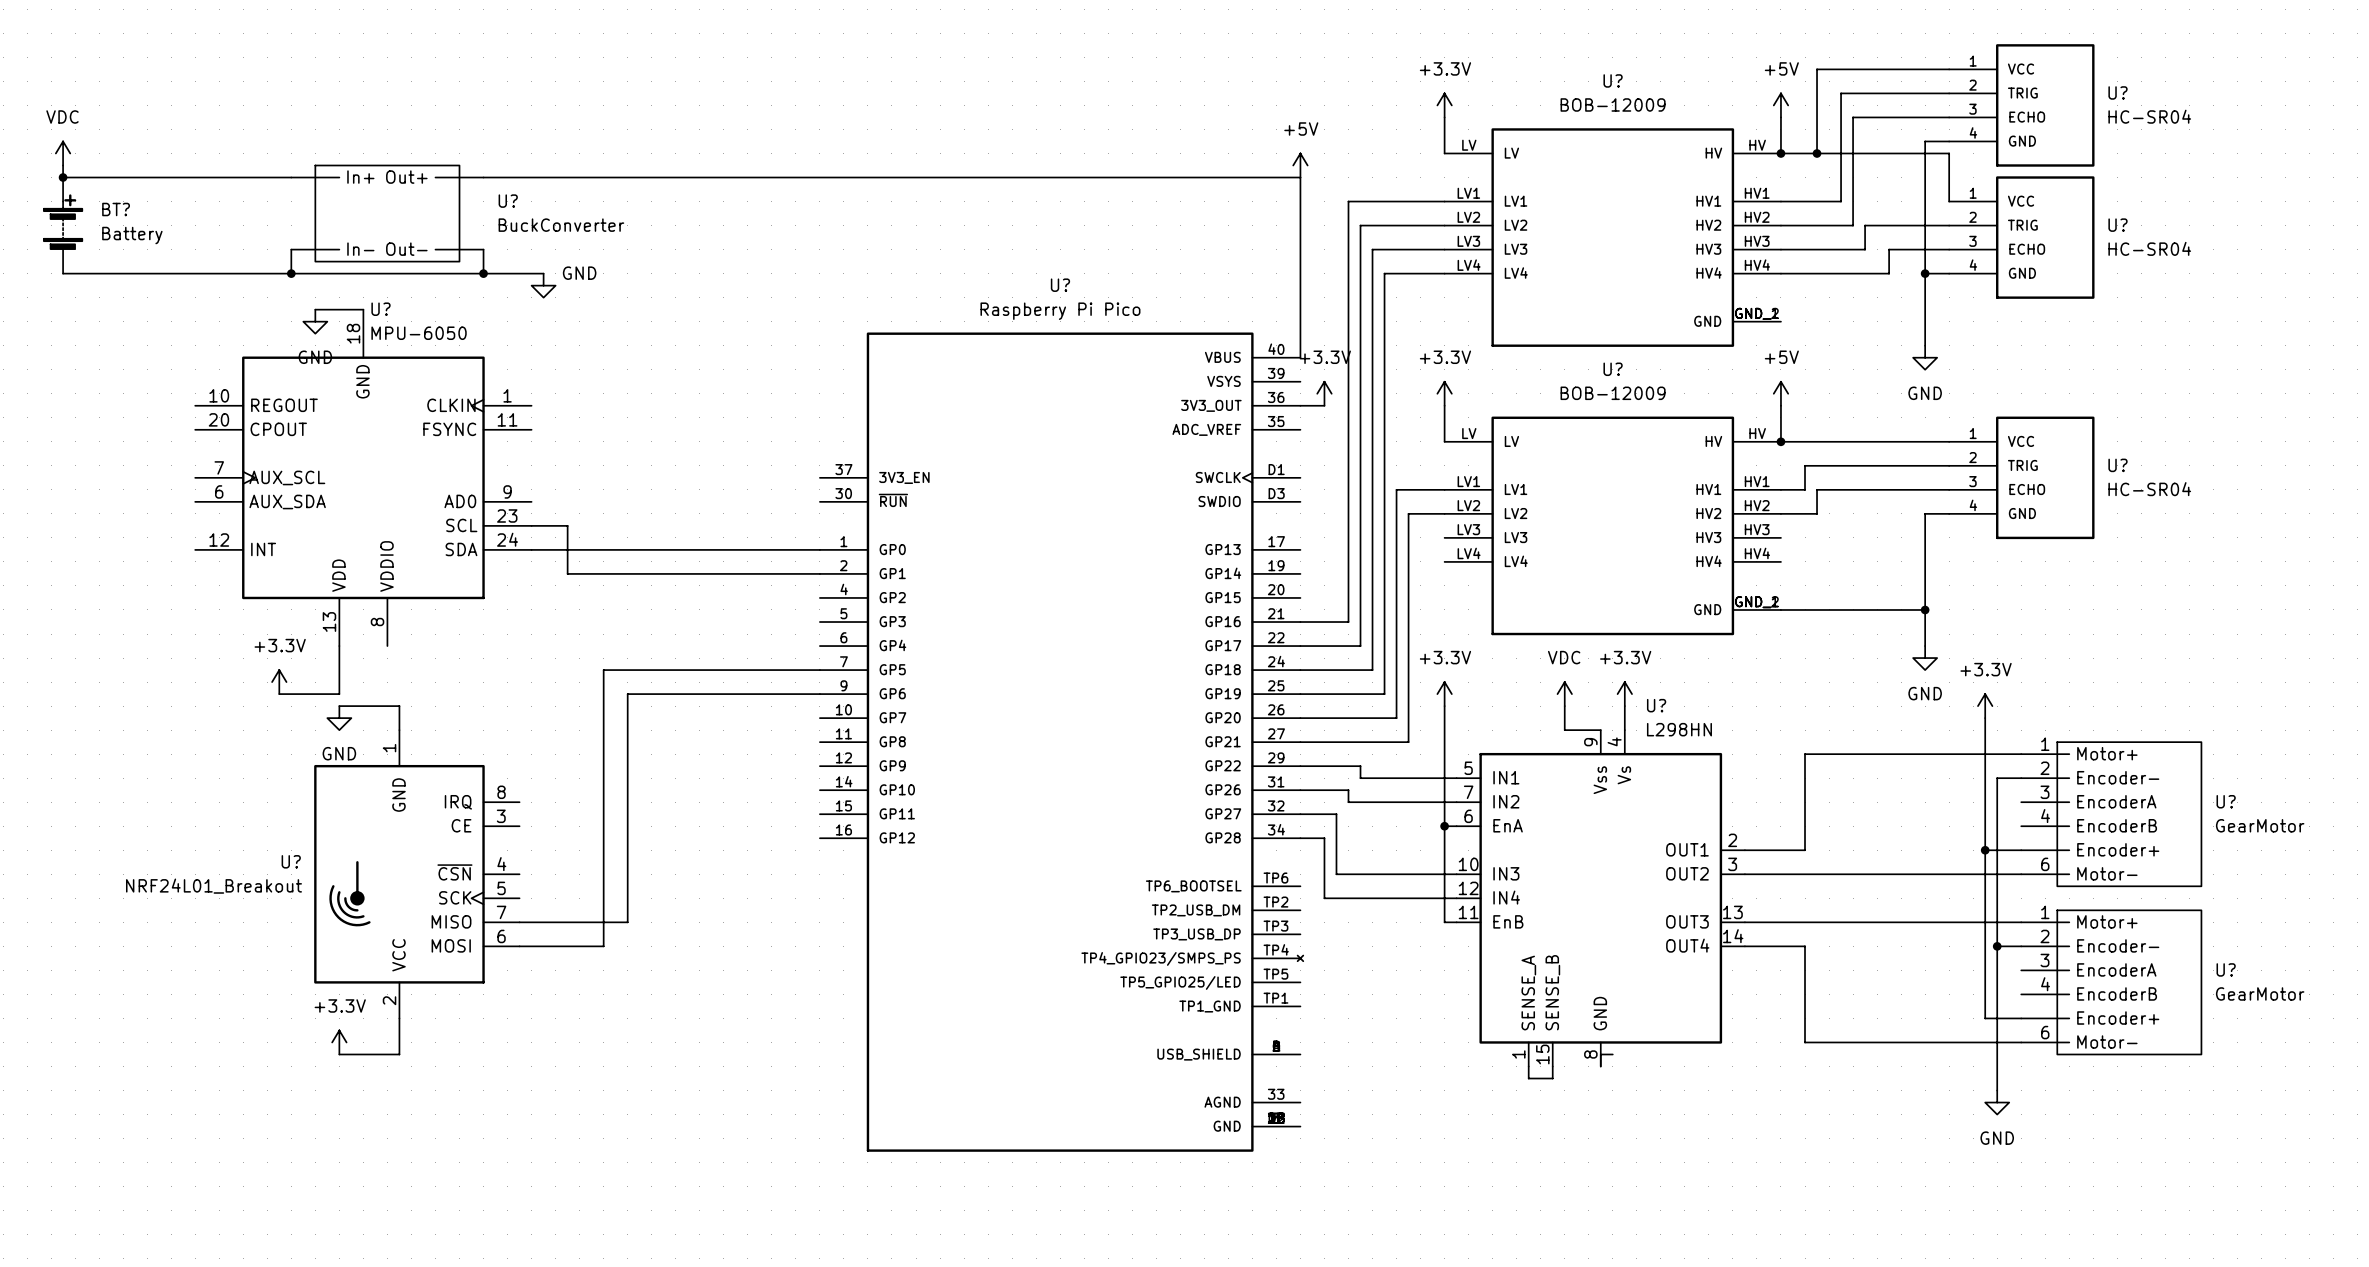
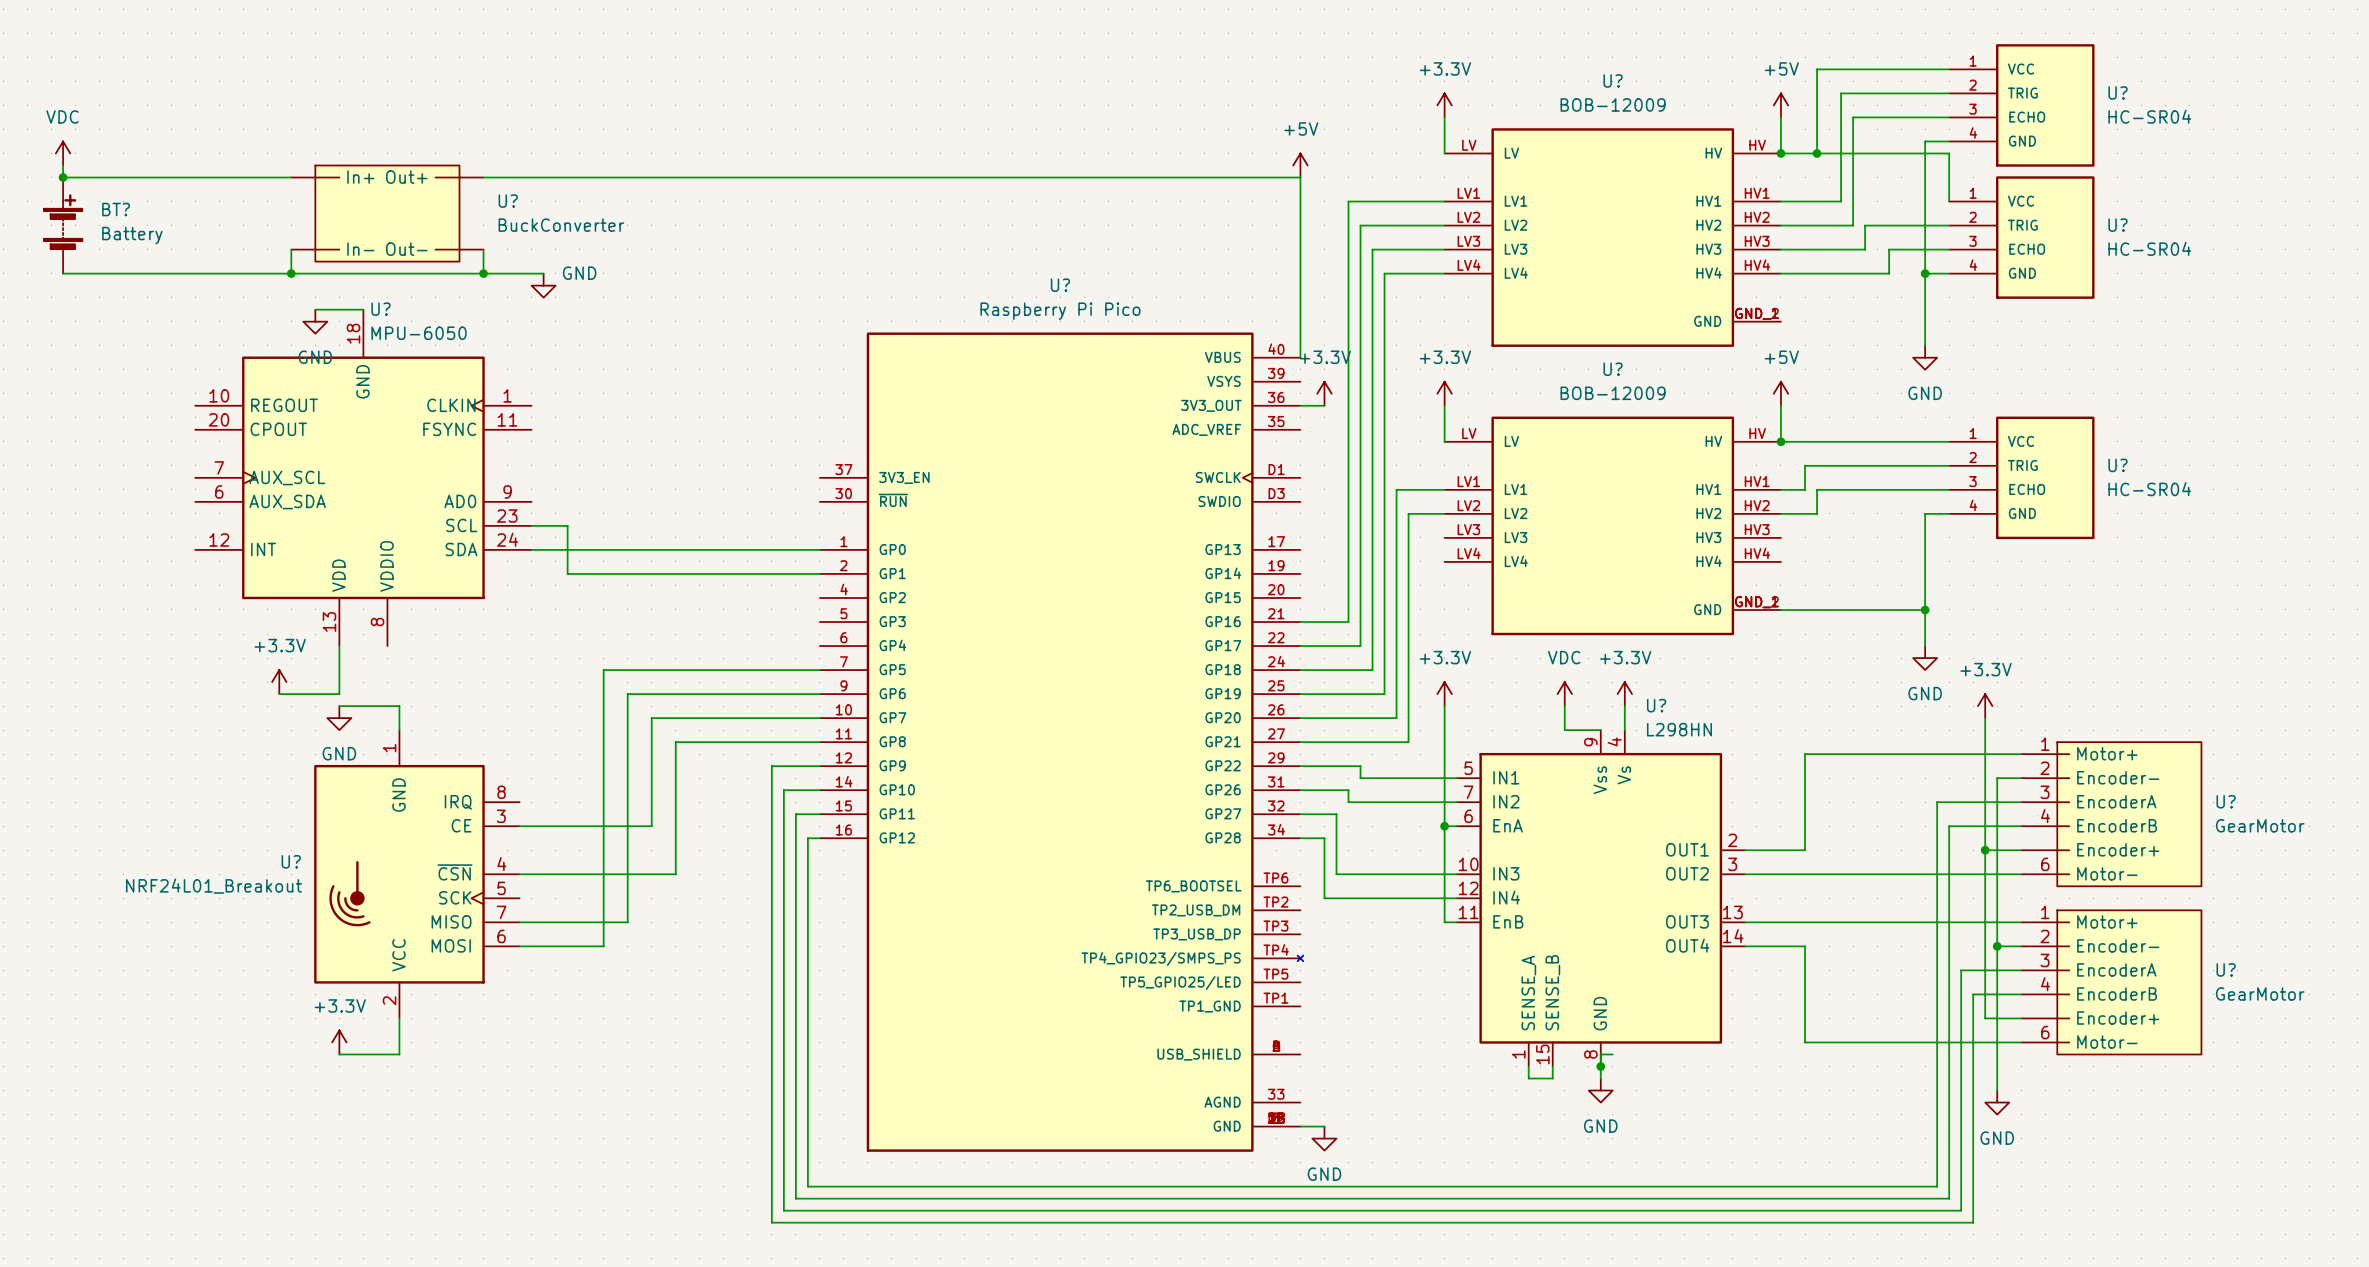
wire: none -> (819, 718) (651, 718) (651, 826) (519, 826)
wire: none -> (819, 742) (675, 742) (675, 874) (519, 874)
wire: none -> (819, 766) (771, 766) (771, 1222) (1973, 1222) (1973, 994) (2021, 994)
wire: none -> (819, 790) (783, 790) (783, 1210) (1961, 1210) (1961, 970) (2021, 970)
wire: none -> (2021, 802) (1937, 802) (1937, 1186) (807, 1186) (807, 838) (819, 838)
wire: none -> (819, 814) (795, 814) (795, 1198) (1949, 1198) (1949, 826) (2021, 826)
wire: none -> (1600, 1066) (1600, 1078)
junction: none -> (1600, 1066)
power symbol: none -> GND (1600, 1090)
wire: none -> (1300, 1126) (1324, 1126)
power symbol: none -> GND (1324, 1138)

